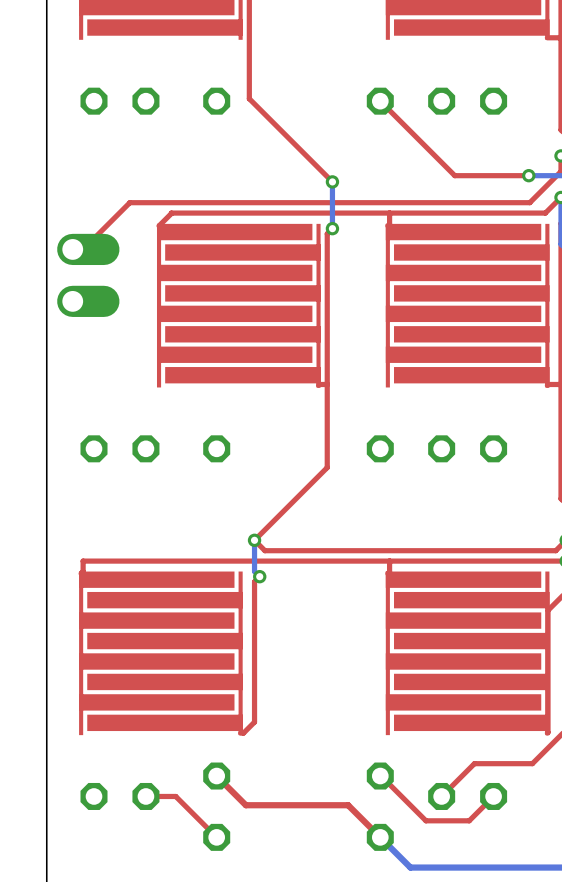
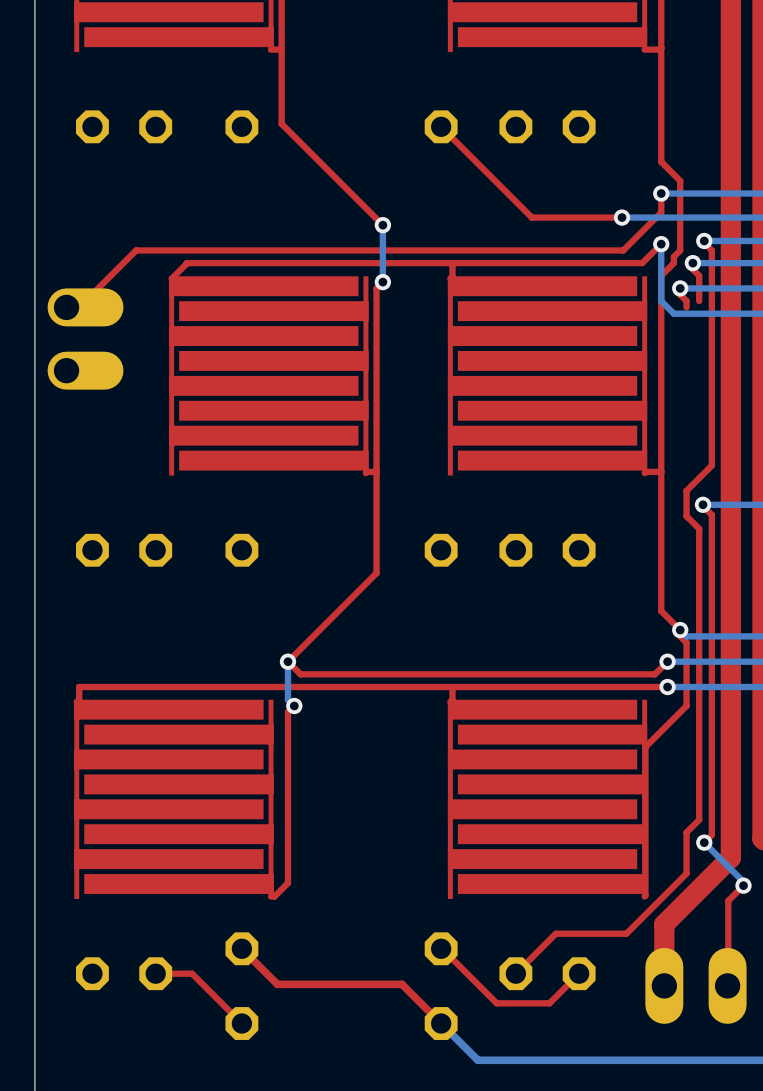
top track: none -> (281, 48) (271, 49)

